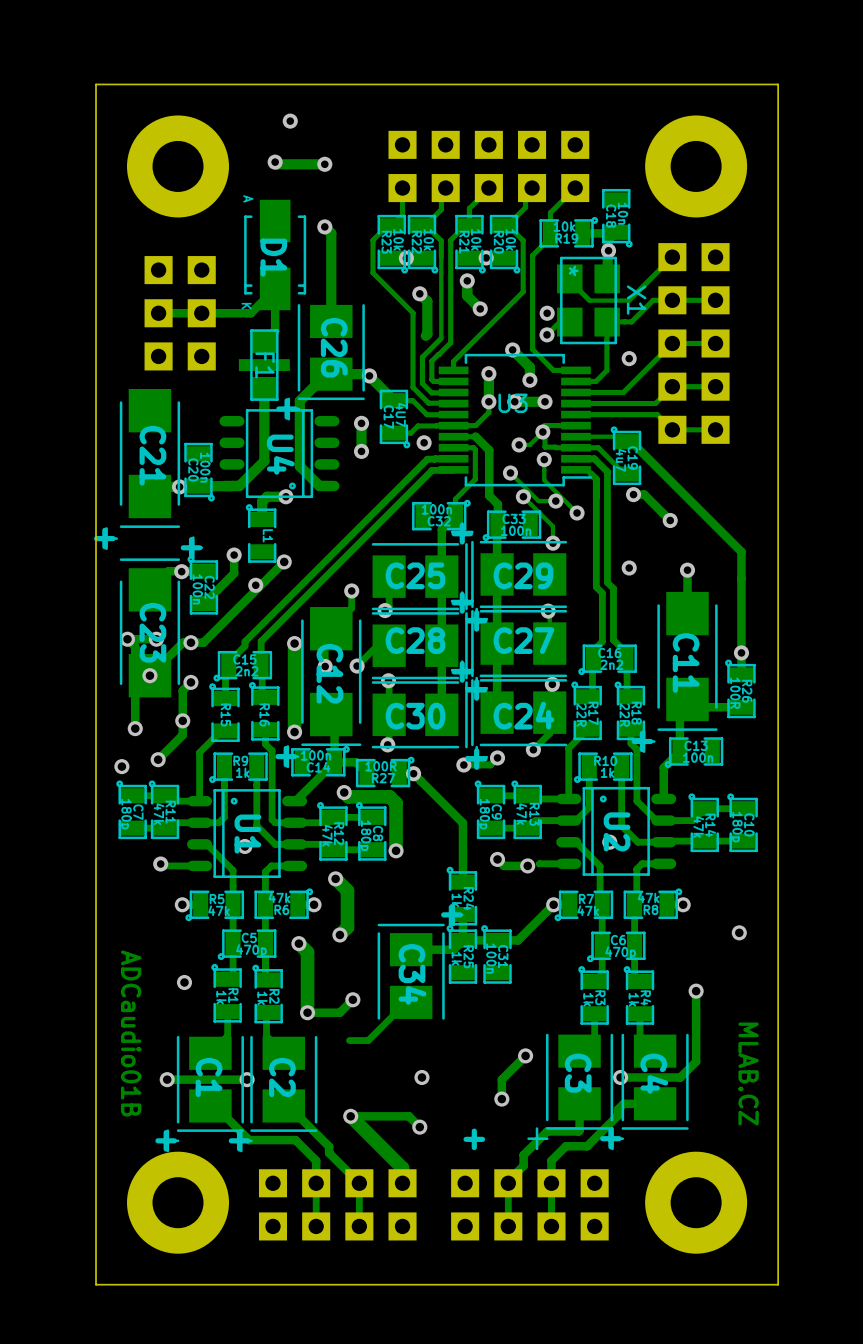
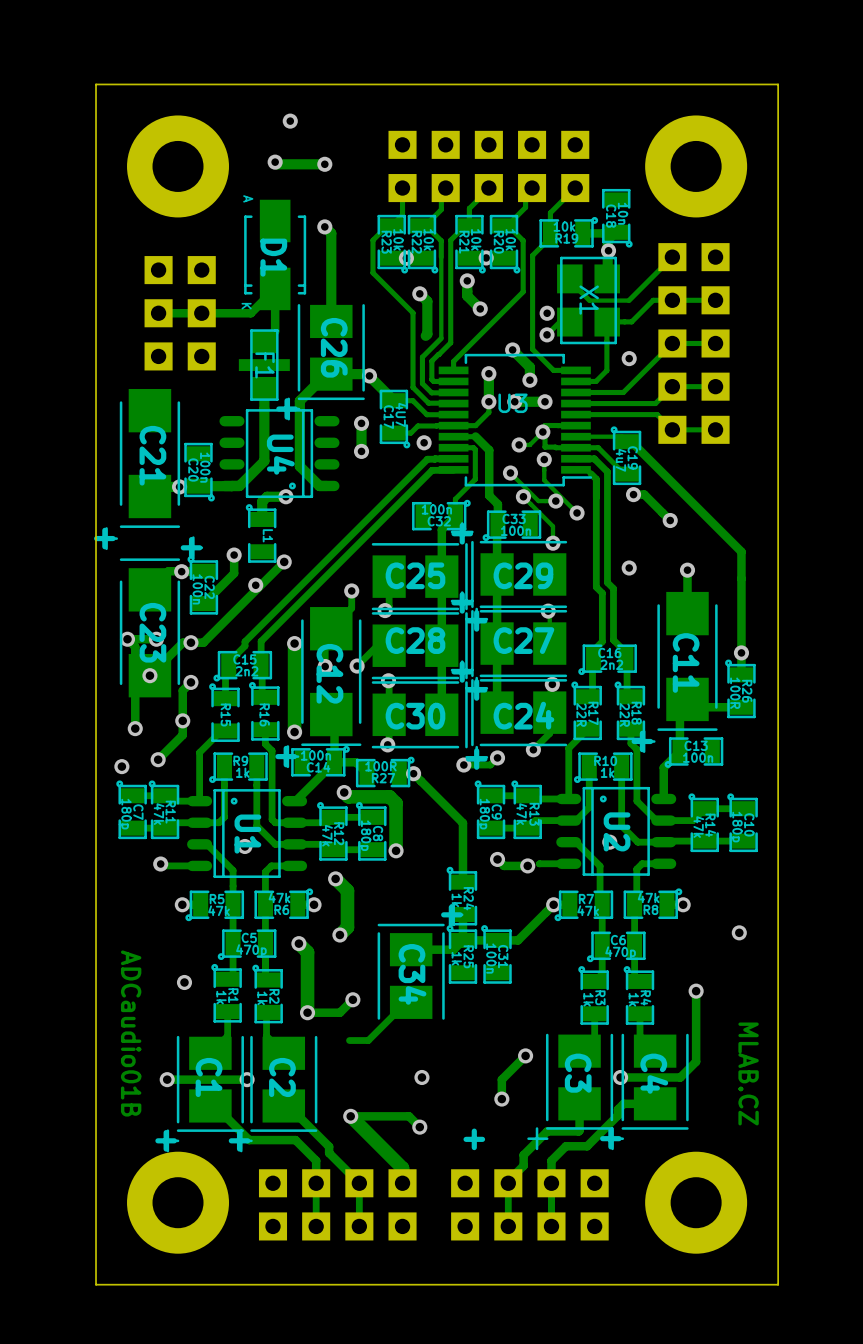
X1 text: * (573, 270) -> none
X1 name position: X1 (636, 300) -> X1 (589, 300)

